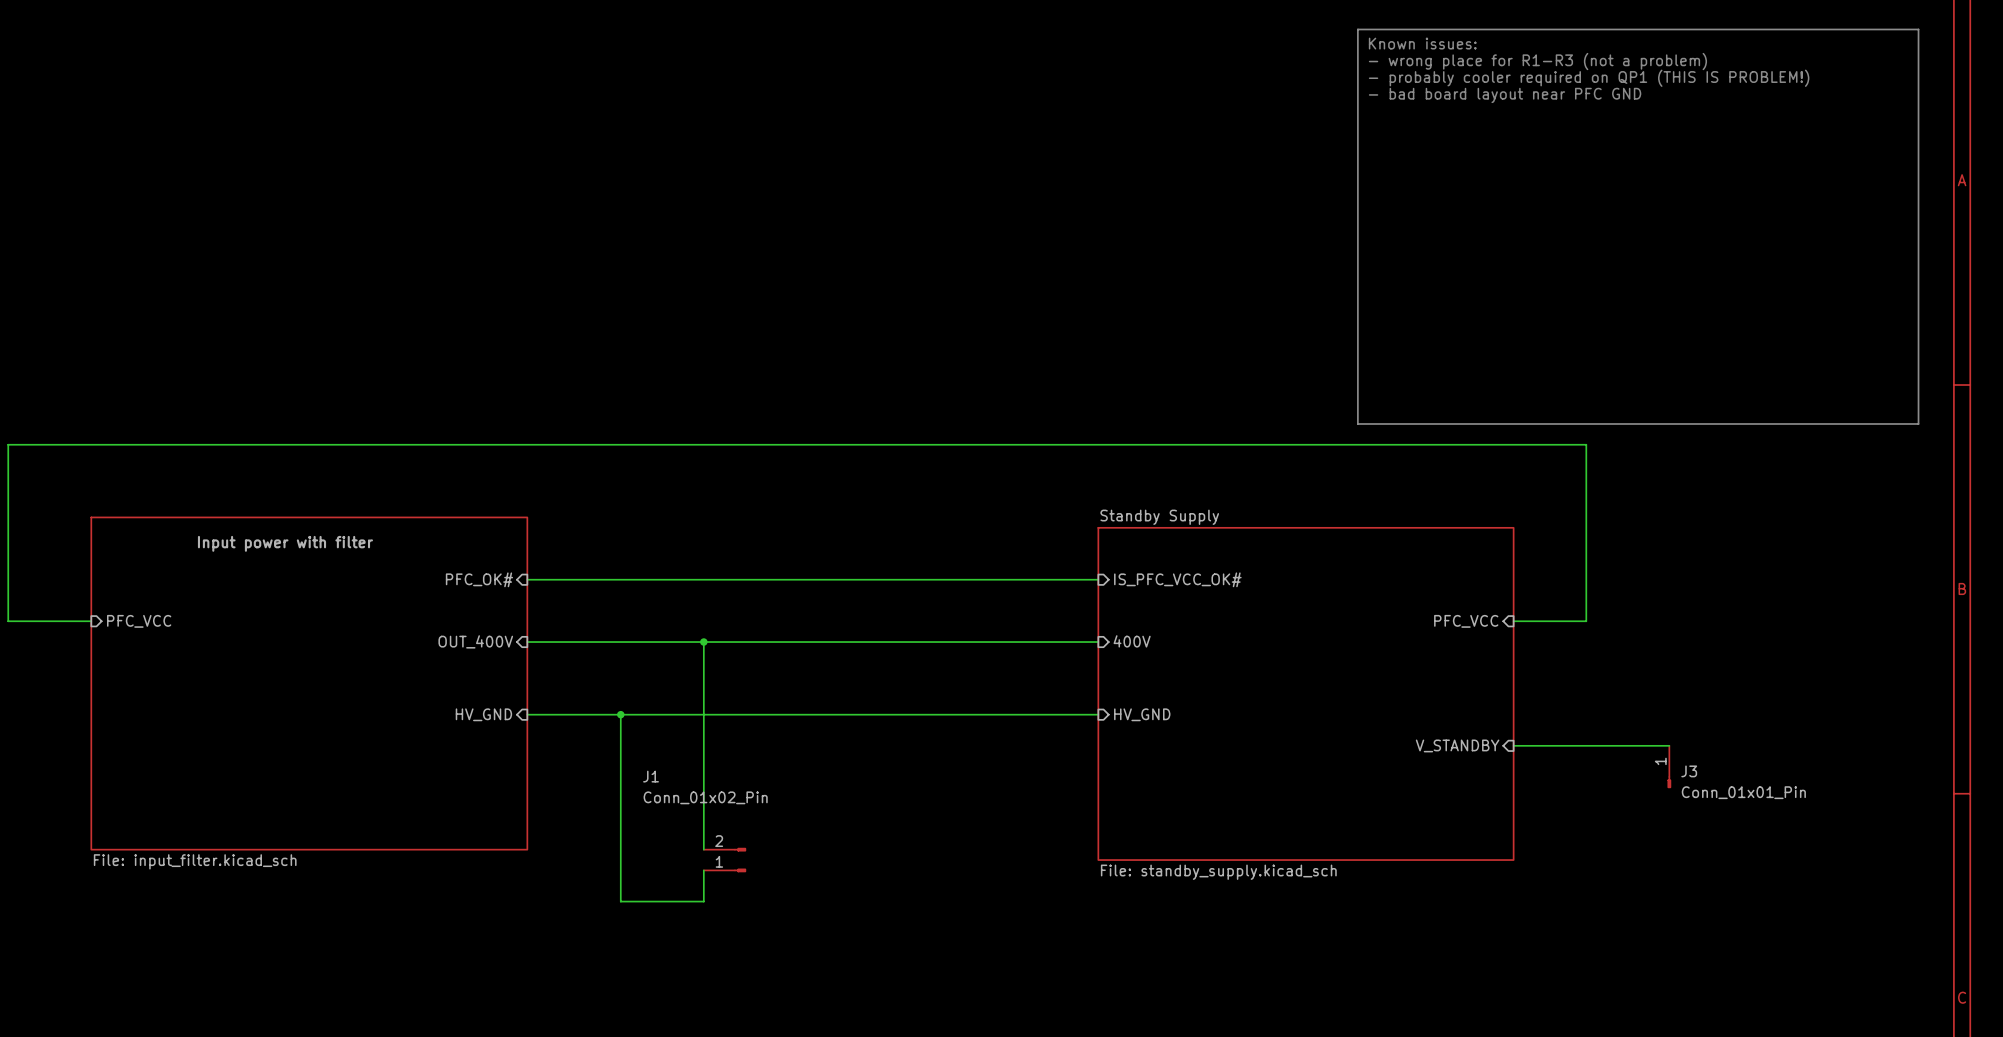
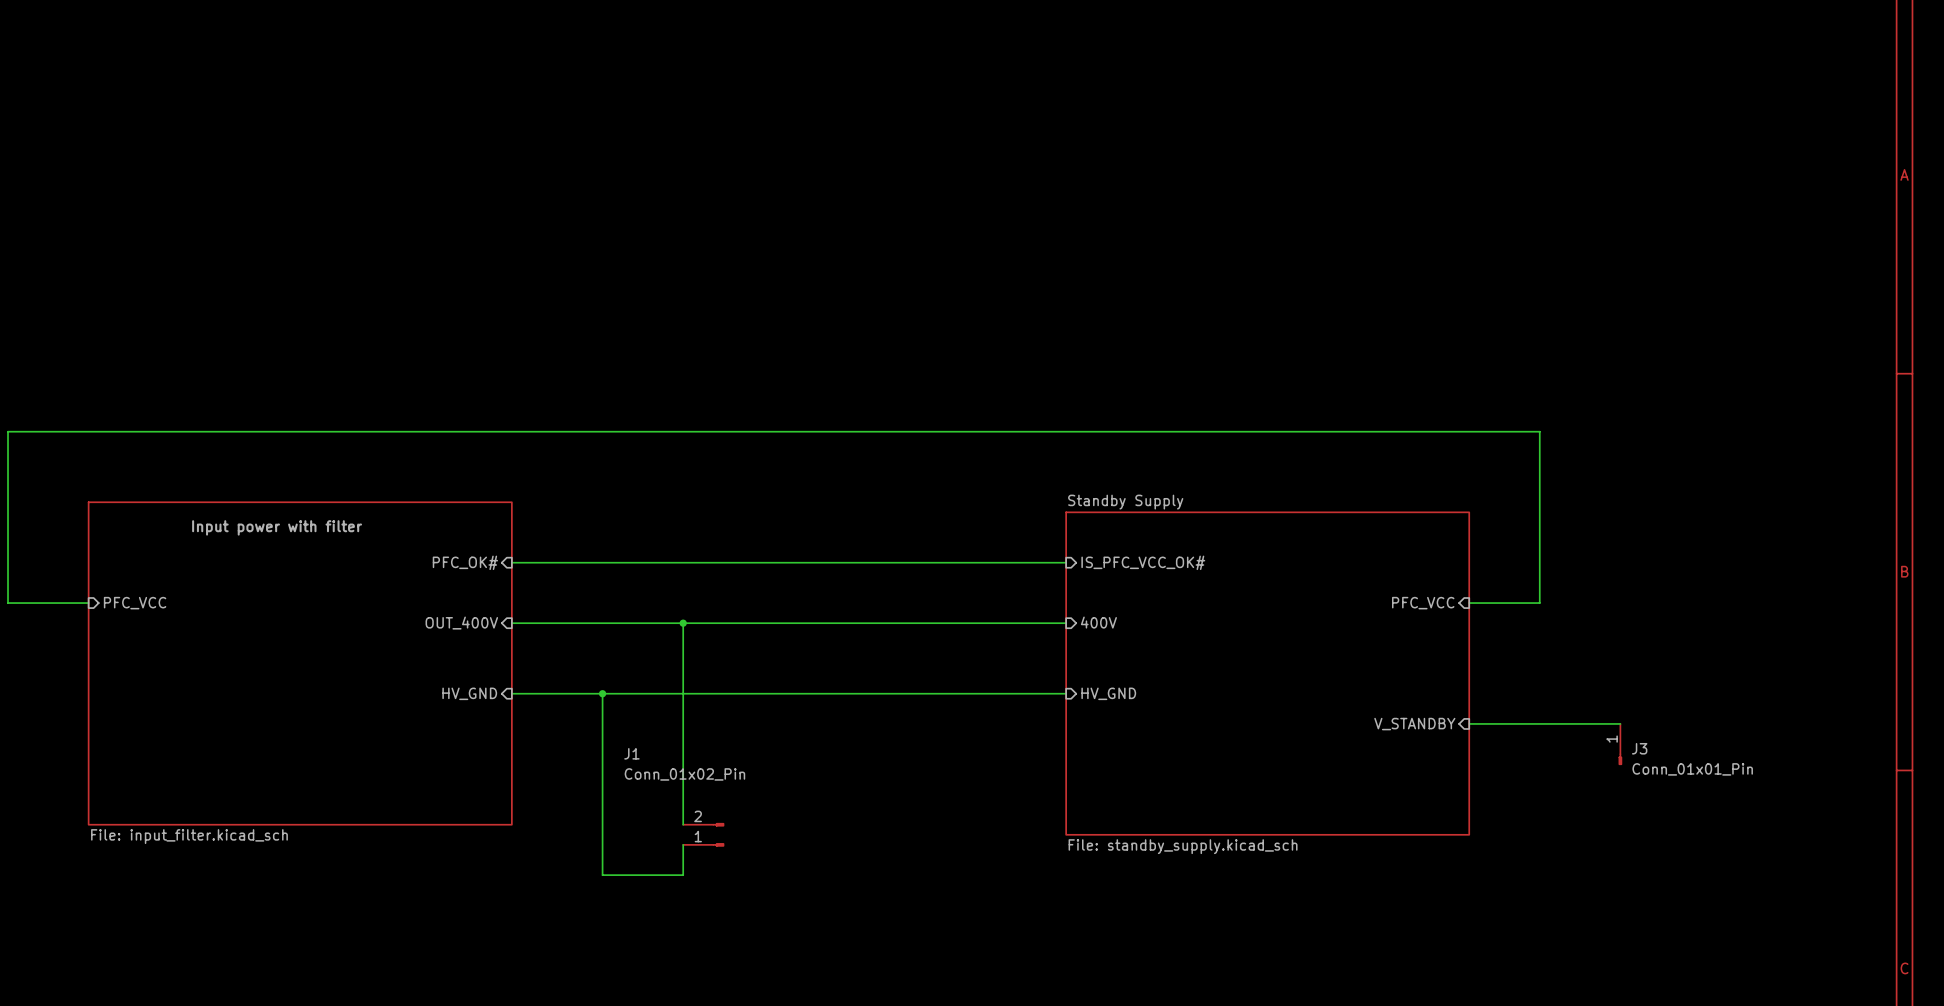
line: (1357, 29) (1918, 29) (1918, 423) (1357, 423) (1357, 29) -> none
text: Known issues: (1422, 43) -> none
text: - wrong place for R1-R3 (not a problem) (1537, 61) -> none
text: - probably cooler required on QP1 (THIS IS PROBLEM!) (1589, 78) -> none
text: - bad board layout near PFC GND (1505, 95) -> none

